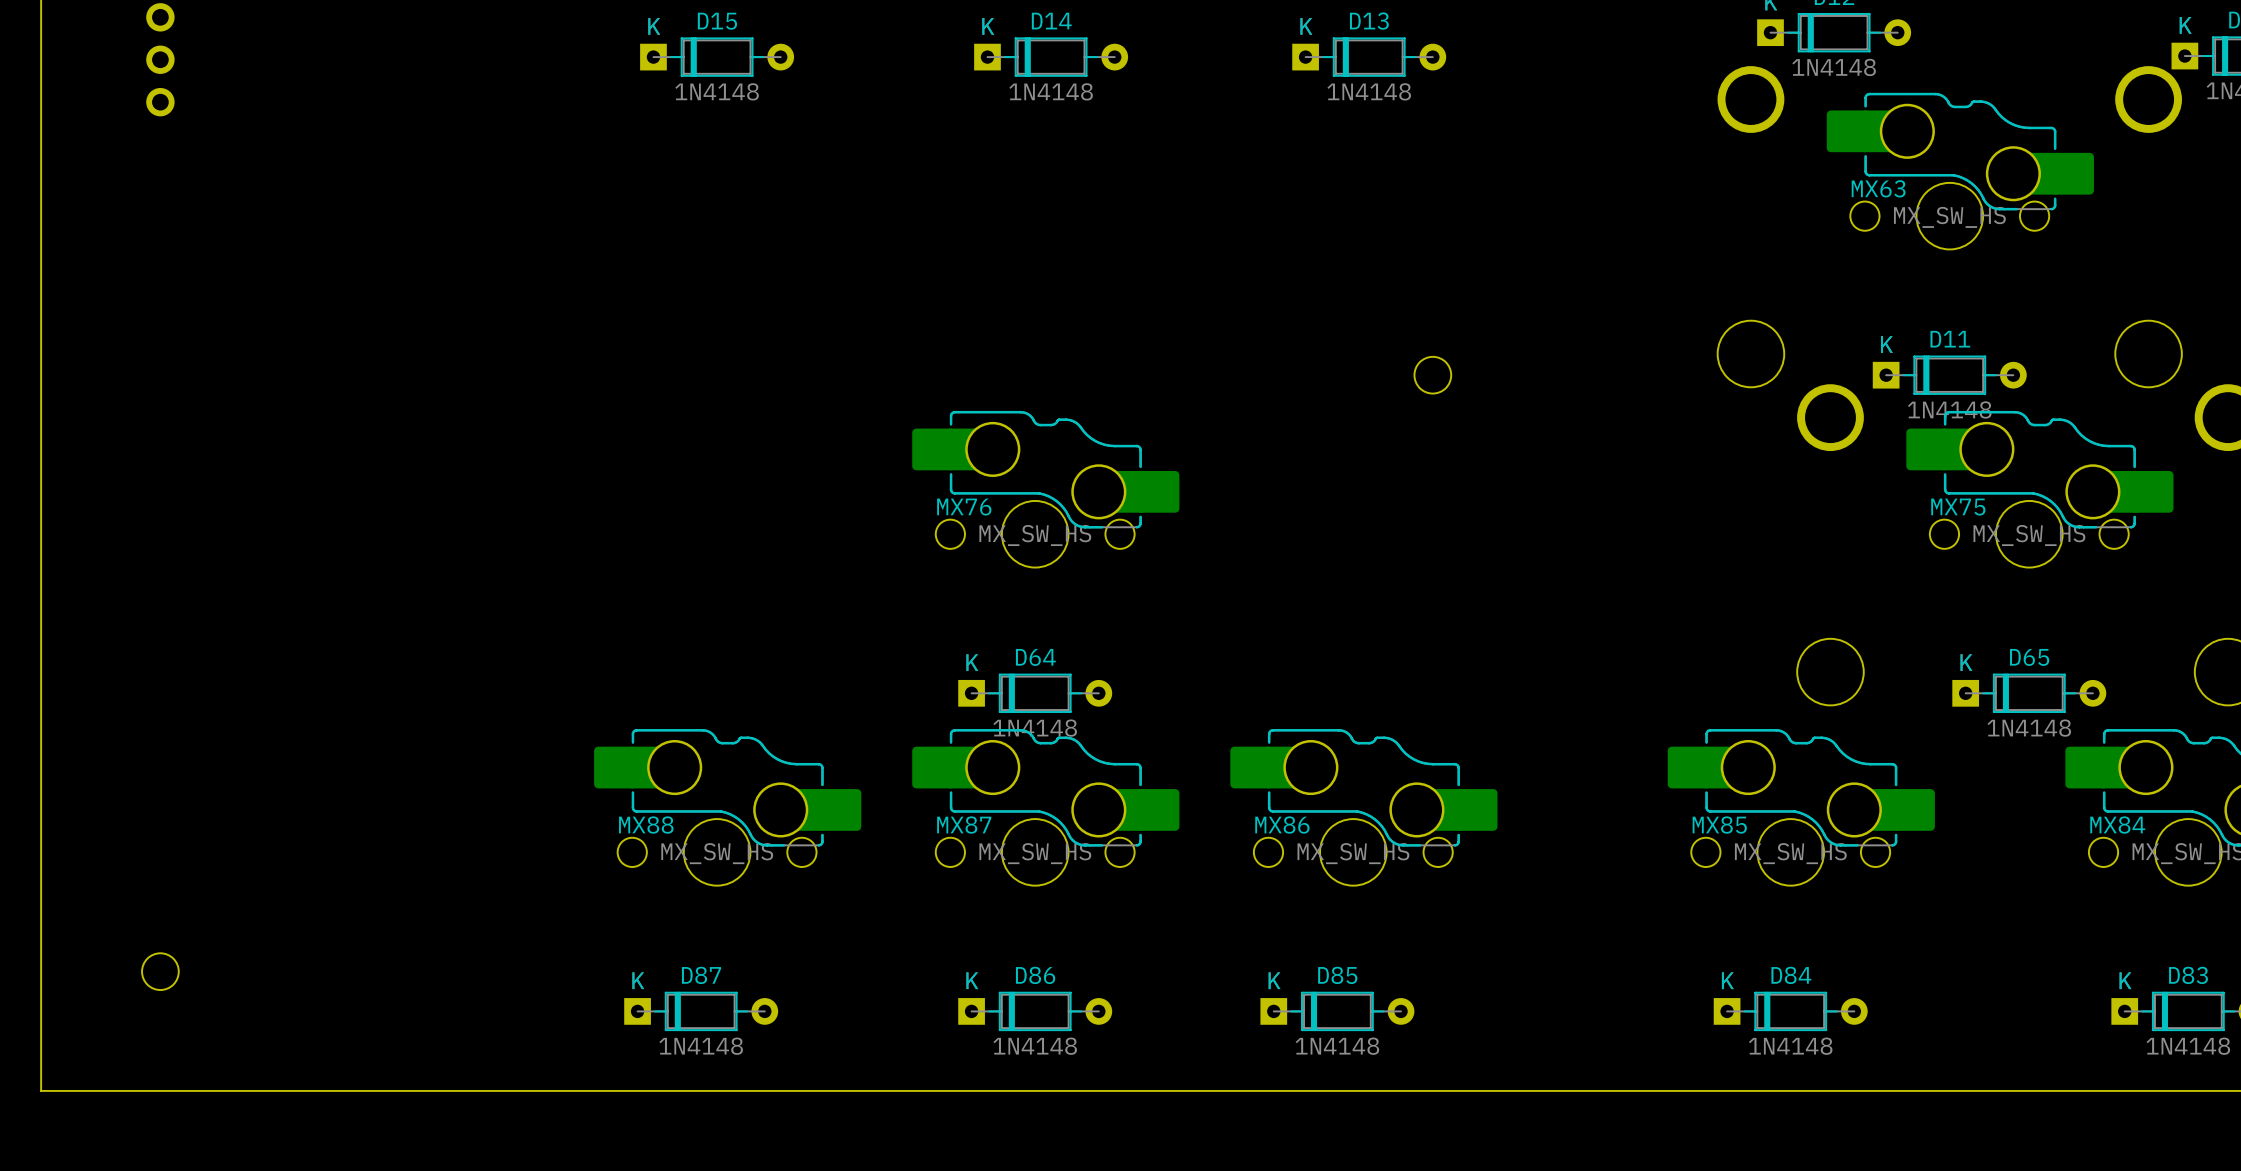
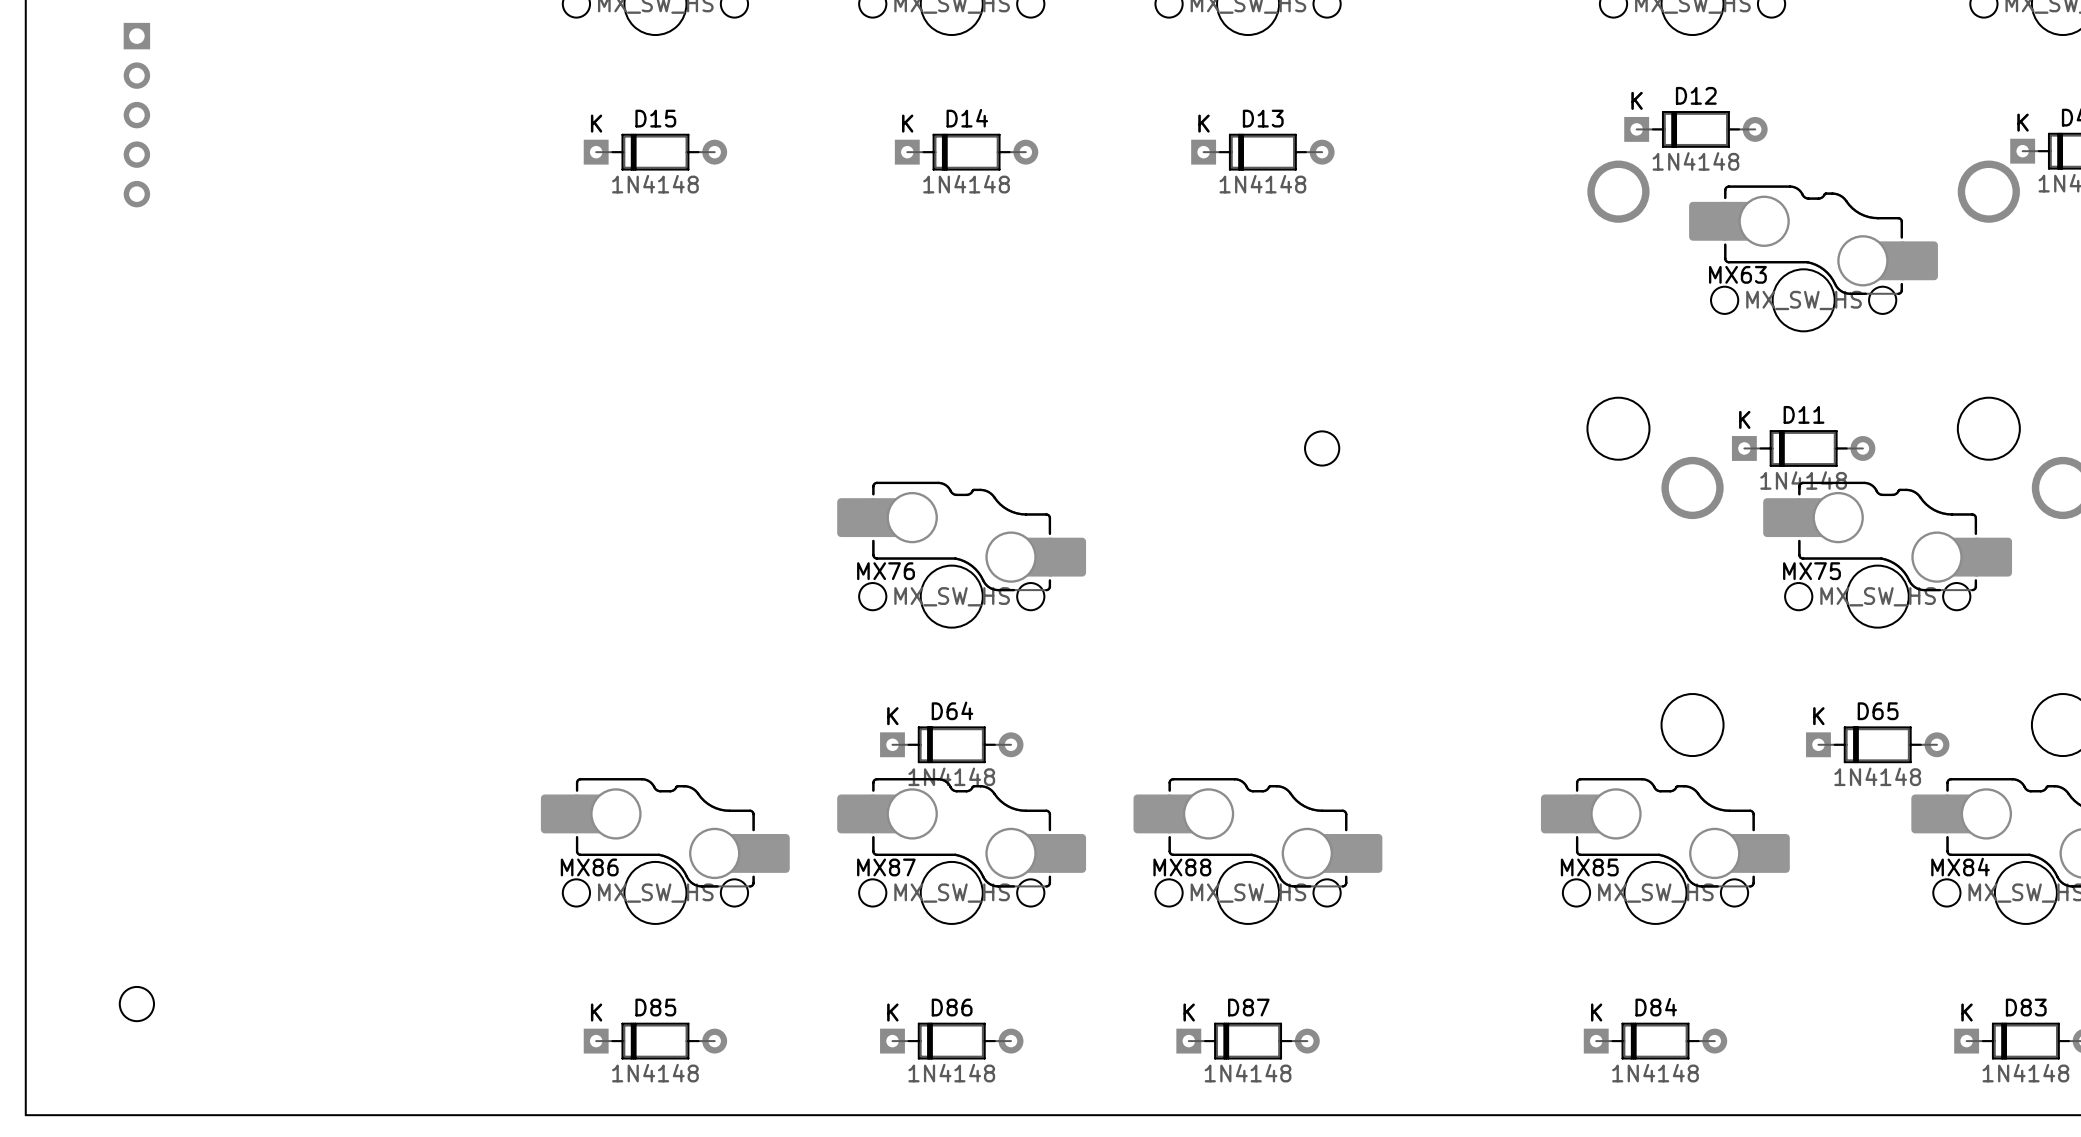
MX88 name: MX88 (646, 825) -> MX86 (589, 867)
MX86 name: MX86 (1282, 825) -> MX88 (1182, 867)
D87 position: (701, 1011) -> (1248, 1041)
D85 position: (1337, 1011) -> (655, 1041)

